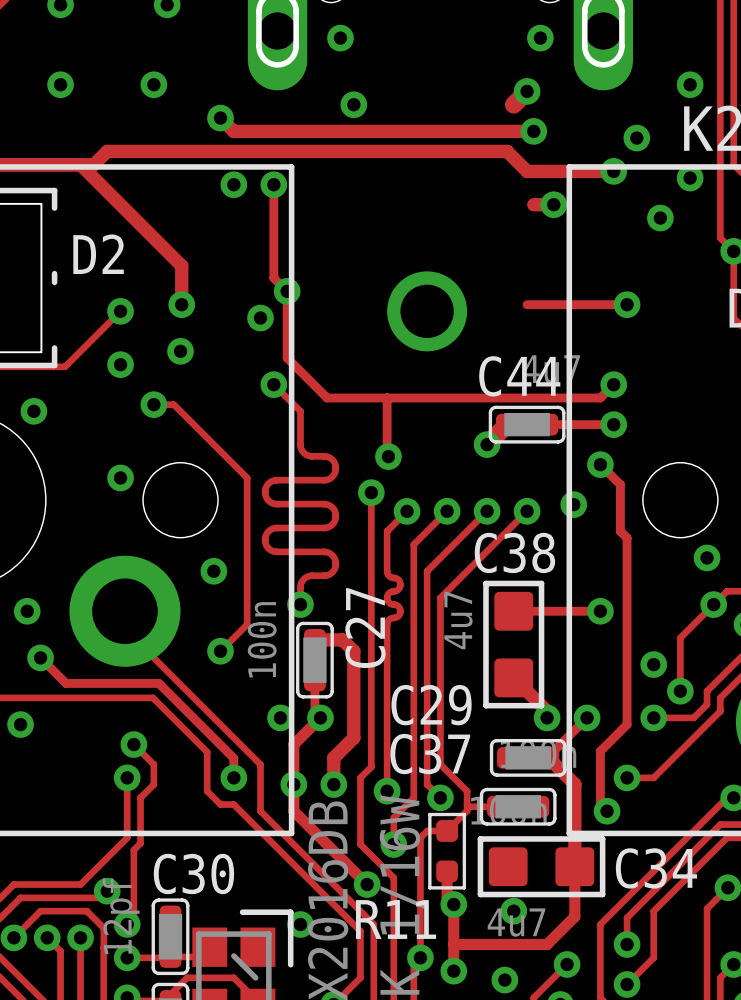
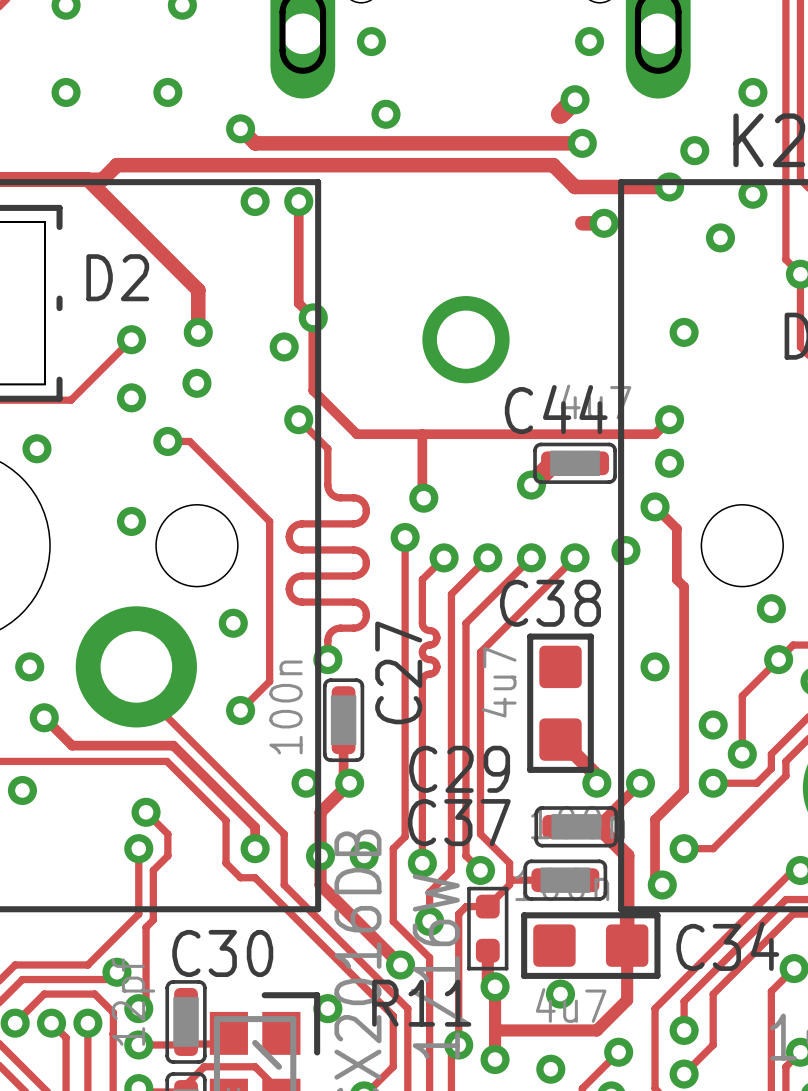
track: (527, 304) (627, 304) -> none
track: (547, 424) (613, 424) -> none
track: (513, 611) (600, 611) -> none
track: (314, 639) (342, 639) (353, 651) (353, 737) (333, 757) (333, 784) -> none

